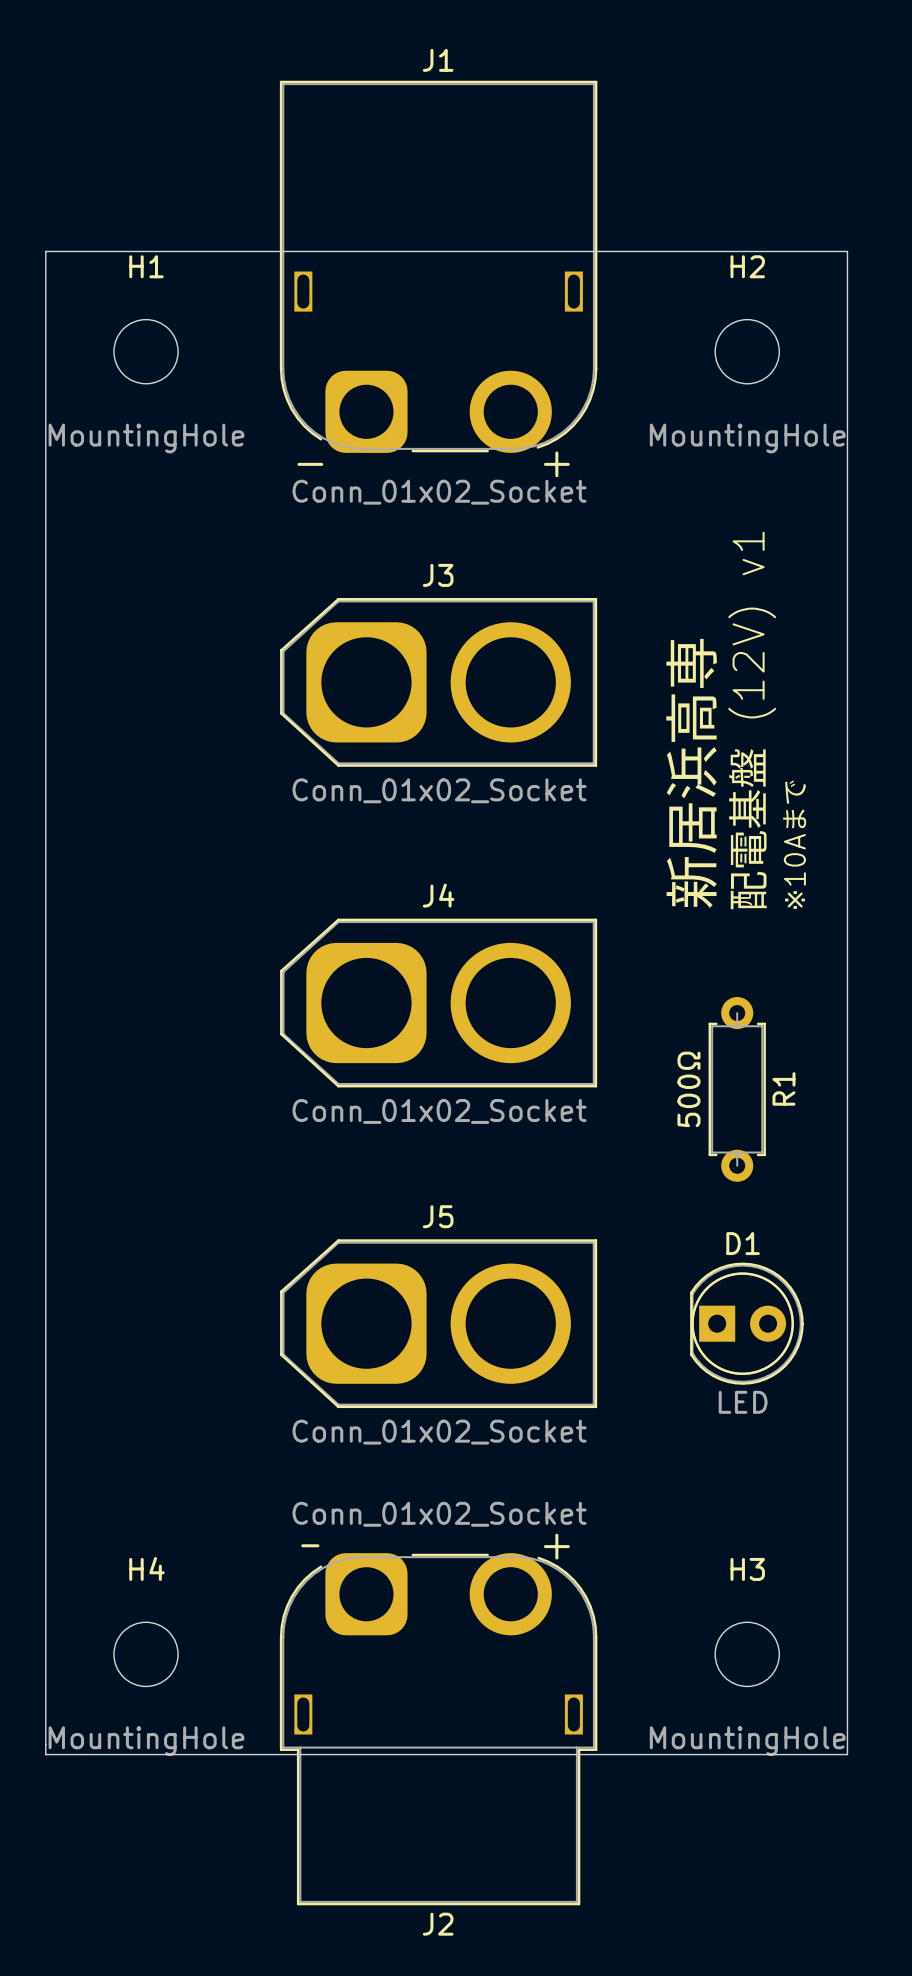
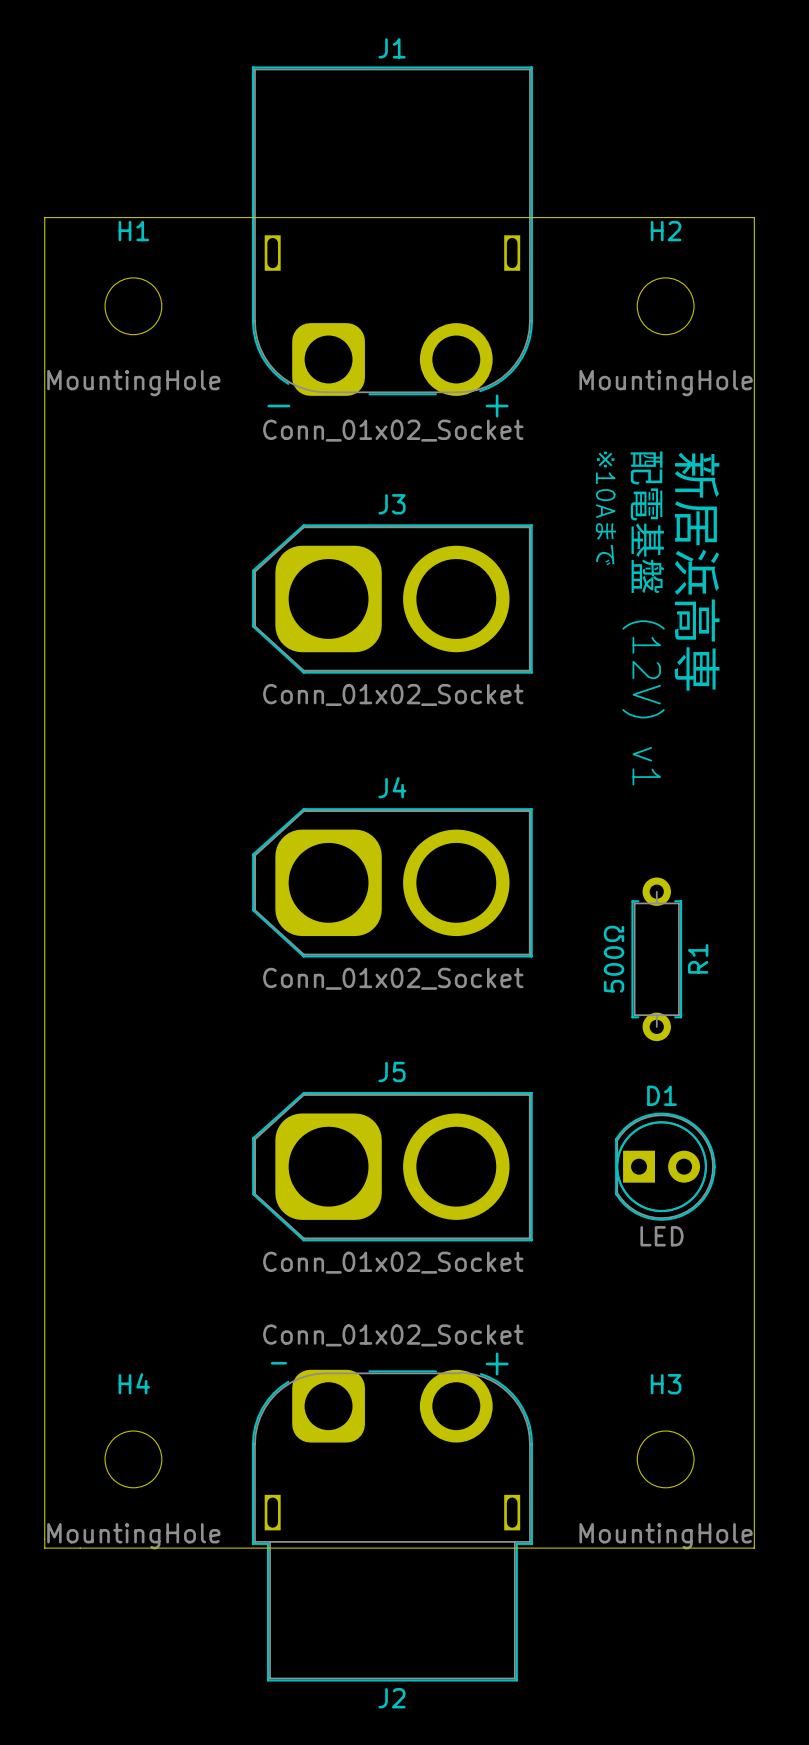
text rotation: 0° (752, 720) -> 180° (643, 618)
text rotation: 0° (691, 773) -> 180° (697, 571)
text rotation: 0° (794, 844) -> 180° (605, 508)
text position: ※10Aまで (794, 844) -> ※10Aまで (605, 508)

